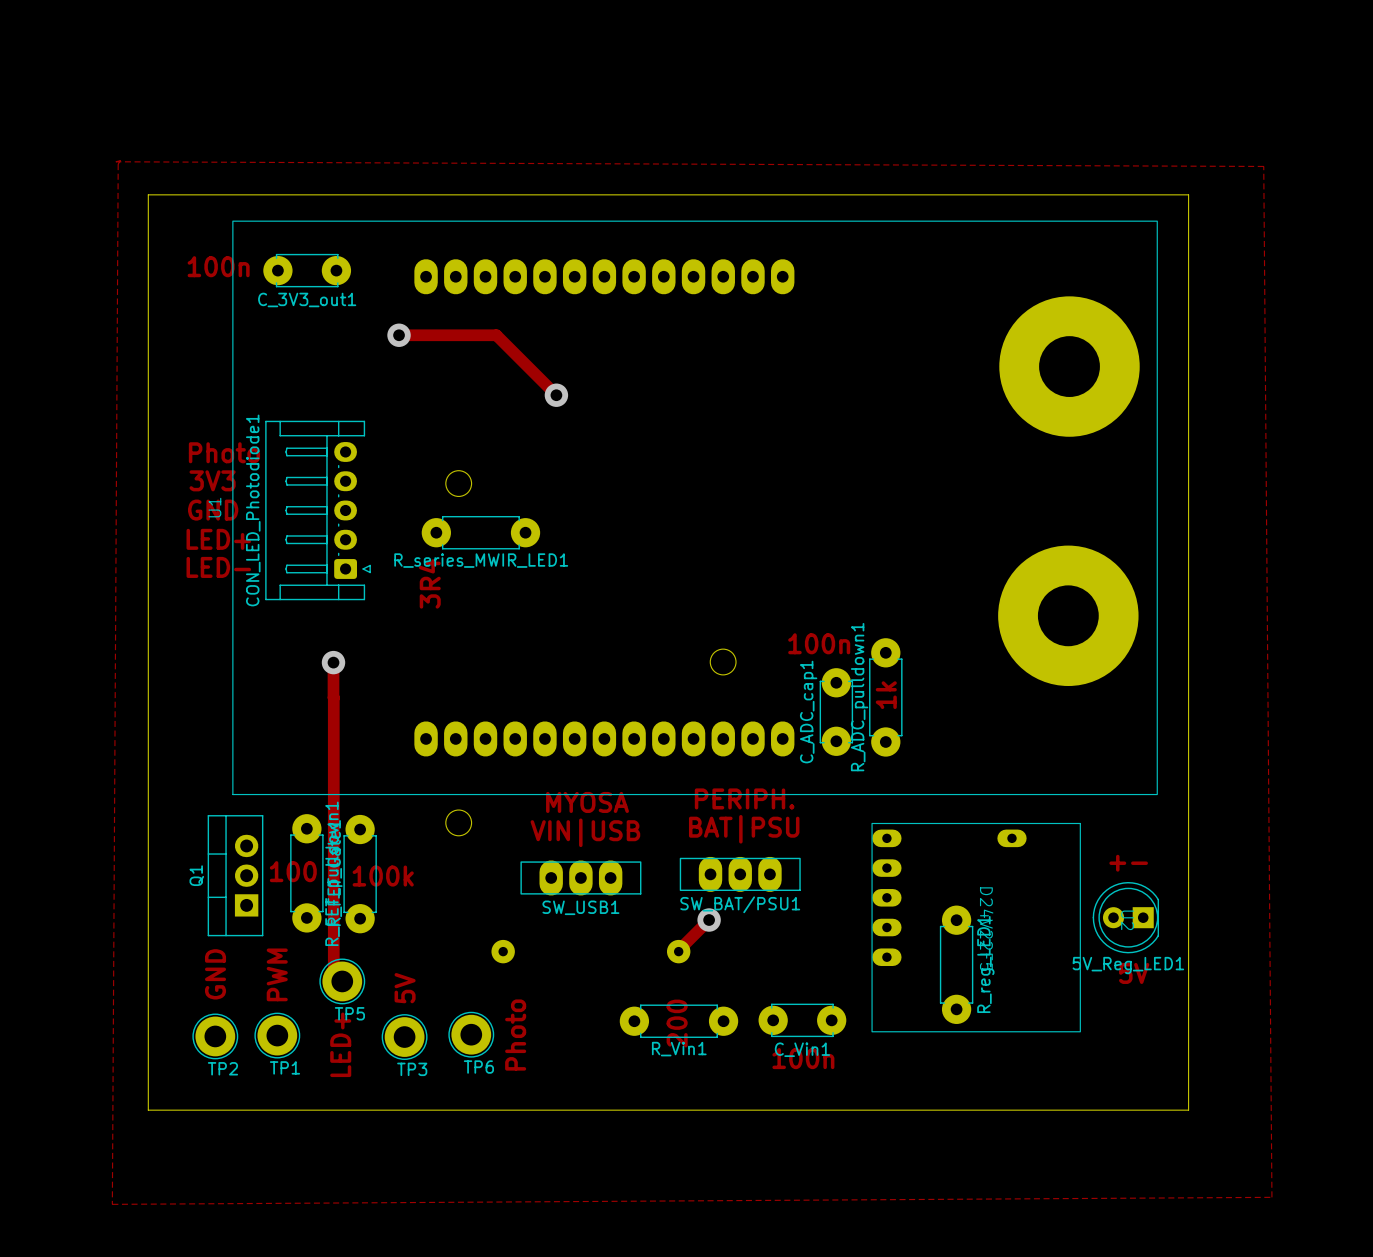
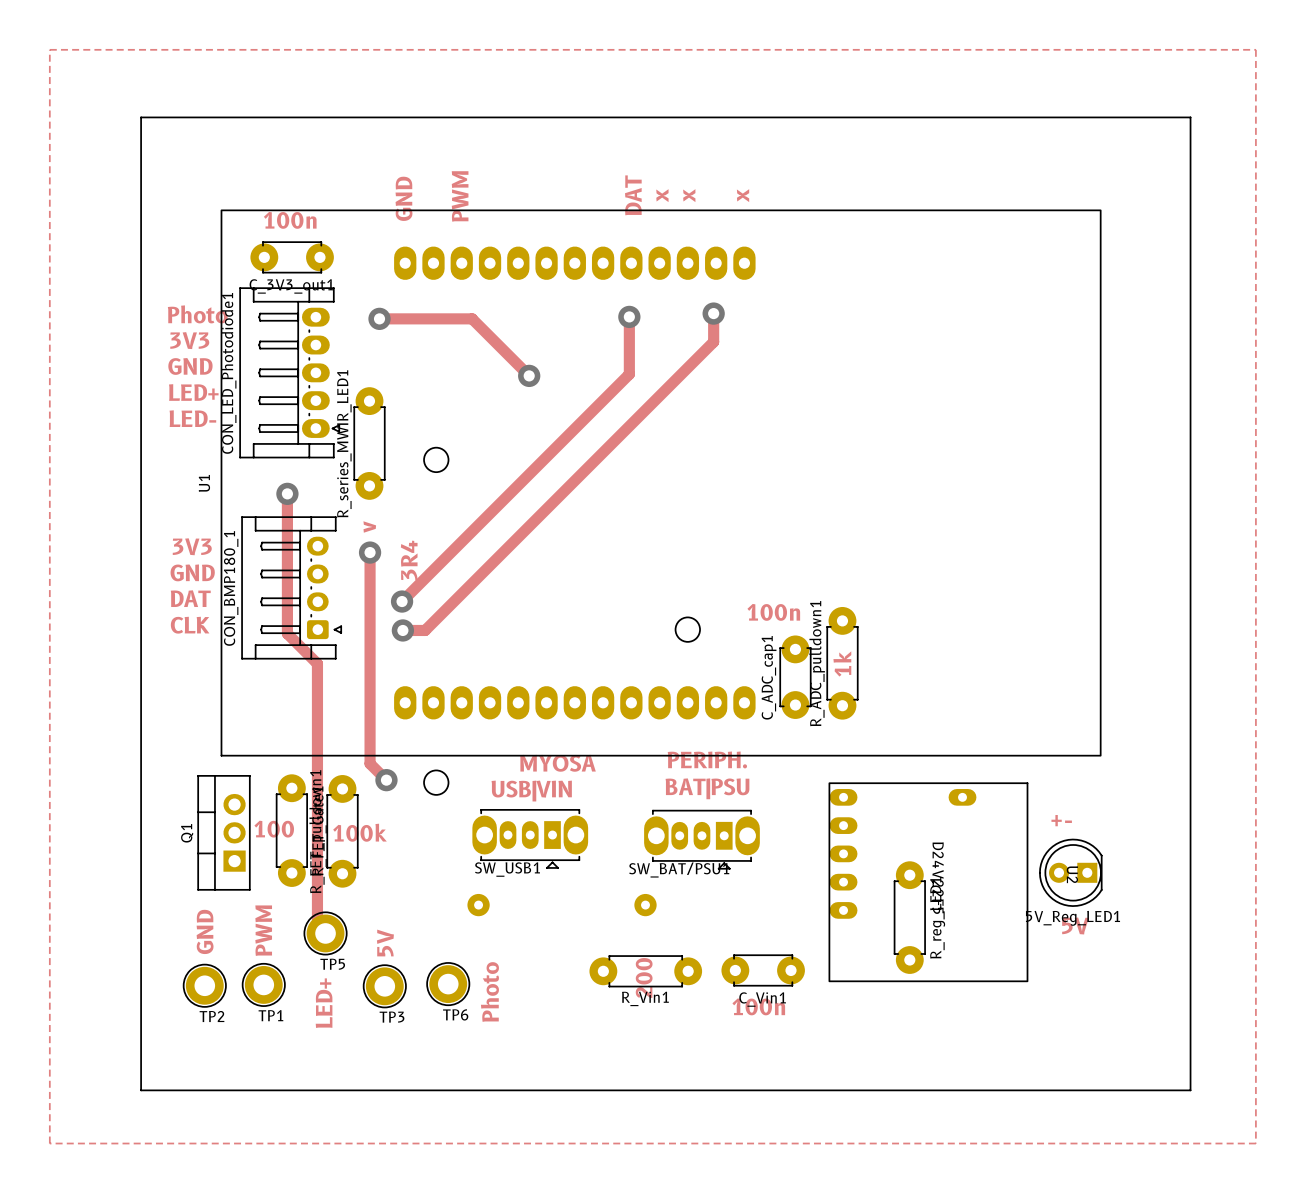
zone outline: (120, 160) (115, 161) (1263, 166) (1271, 1197) (112, 1204) (118, 164) (120, 160) -> (49, 49) (49, 1143) (1255, 1143) (1255, 49) (49, 49)
board edge: (148, 194) (1188, 194) (1188, 1110) (148, 1110) -> (141, 185) (141, 117) (1190, 117) (1190, 1090) (141, 1090) (141, 1055)
text: none -> PWM (460, 196)
text: none -> GND (403, 198)
text: none -> DAT (633, 195)
text: none -> x (662, 195)
text: none -> x (689, 195)
text: none -> x (743, 195)
text position: 100n (218, 266) -> 100n (290, 220)
track: none -> (713, 313) (713, 341) (425, 630) (402, 630)
via: none -> (713, 313)
track: none -> (629, 316) (629, 374) (402, 601)
via: none -> (629, 316)
text: none -> 3V3 (189, 340)
part: (1069, 366) -> none
text: none -> GND (190, 366)
CON_LED_Photodiode1 footprint: [265, 420, 371, 601] -> [239, 287, 340, 459]
text position: Photo (224, 452) -> Photo (197, 314)
text: 3V3 (212, 480) -> none
text: GND (213, 510) -> none
via: none -> (287, 493)
R_series_MWIR_LED1 rotation: 0° (480, 532) -> 90° clockwise (369, 443)
R_series_MWIR_LED1 position: (480, 532) -> (369, 443)
text position: LED+ (218, 539) -> LED+ (193, 392)
text: none -> v (369, 527)
text position: LED- (218, 567) -> LED- (192, 418)
text: none -> 3V3 (192, 546)
track: none -> (370, 552) (370, 763) (386, 780)
via: none -> (370, 552)
text: none -> GND (192, 572)
part: (1068, 615) -> none
CON_BMP180_1: none -> (291, 587)
text: none -> DAT (190, 598)
via: none -> (402, 601)
text: none -> CLK (190, 625)
track: (333, 662) (333, 697) -> (287, 493) (287, 633) (317, 663)
via: (333, 662) -> none
via: none -> (402, 630)
via: none -> (386, 780)
text: none -> USB|VIN (531, 791)
text: VIN|USB (585, 832) -> none
SW_BAT/PSU1 footprint: [679, 856, 801, 892] -> [644, 809, 760, 870]
SW_USB1 footprint: [520, 860, 642, 896] -> [472, 809, 589, 869]
track: (709, 920) (678, 951) -> none
via: (709, 920) -> none

